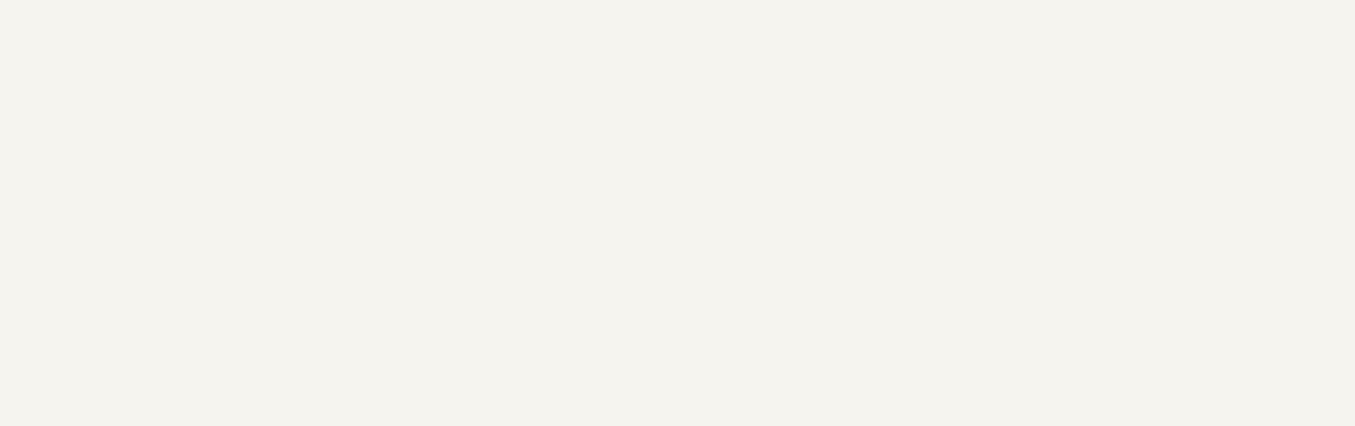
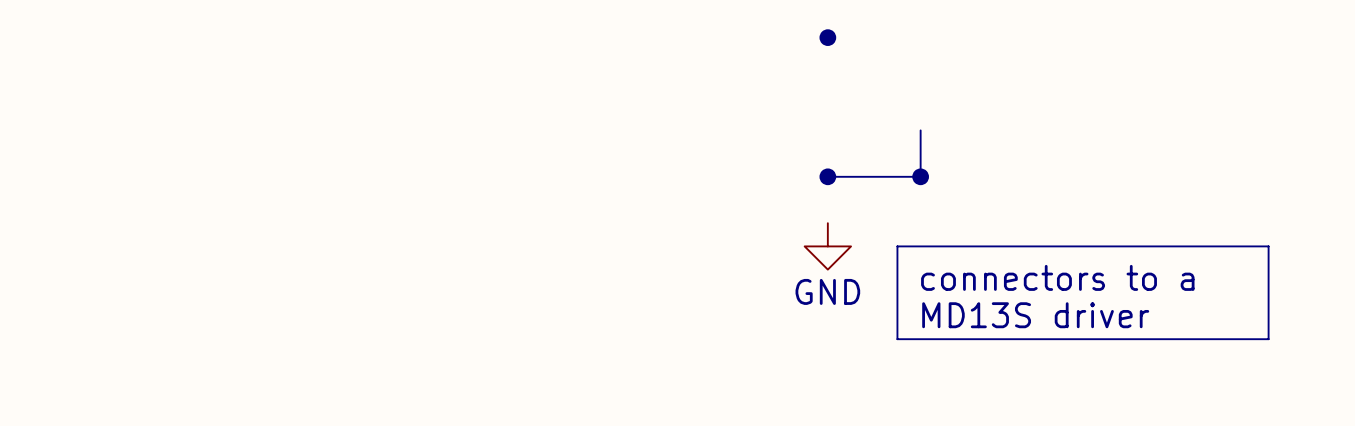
junction: none -> (827, 37)
wire: none -> (920, 130) (920, 176) (827, 176)
junction: none -> (827, 176)
junction: none -> (920, 176)
power symbol: none -> GND (827, 246)
line: none -> (897, 246) (897, 339) (1268, 339) (1268, 246) (897, 246)
text: none -> connectors to a (1057, 277)
text: none -> MD13S driver (1035, 315)

